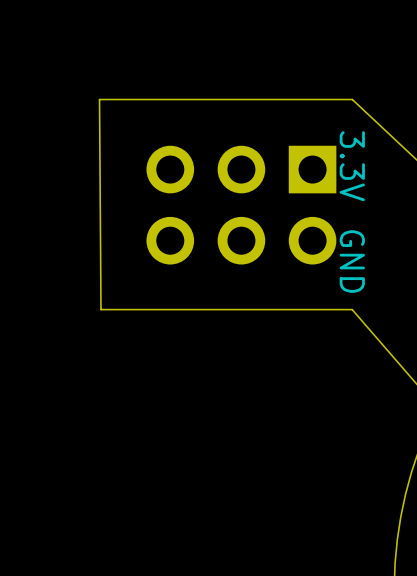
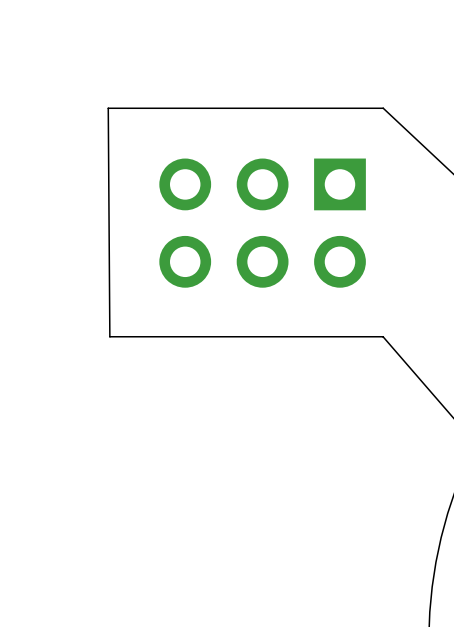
text: 3.3V (352, 166) -> none
text: GND (352, 261) -> none

